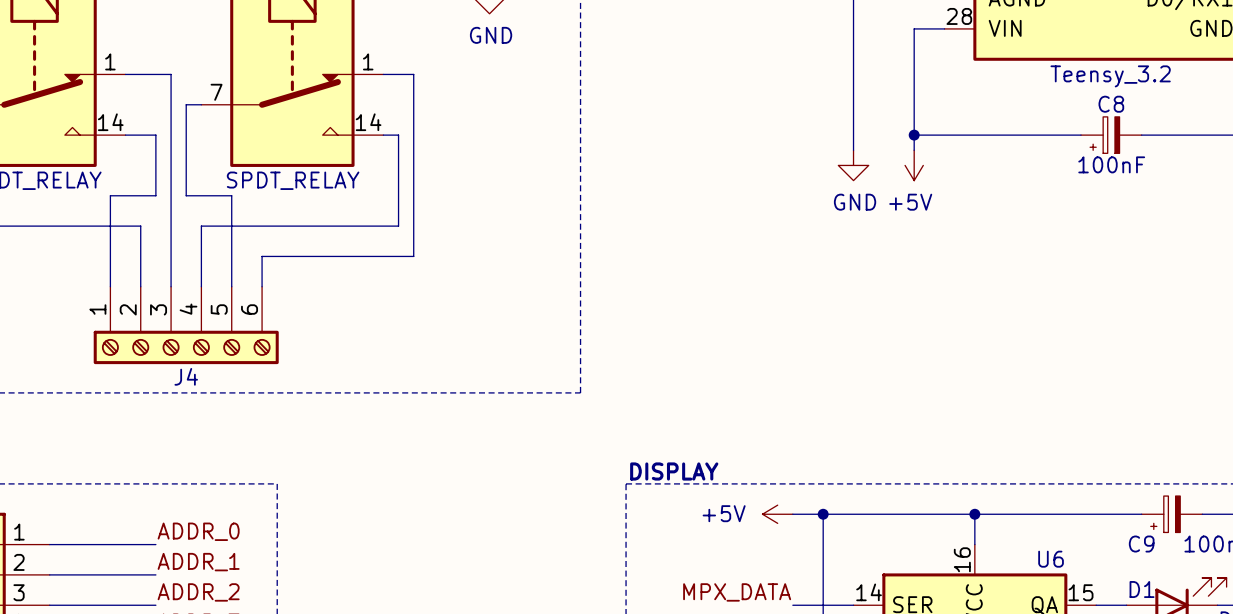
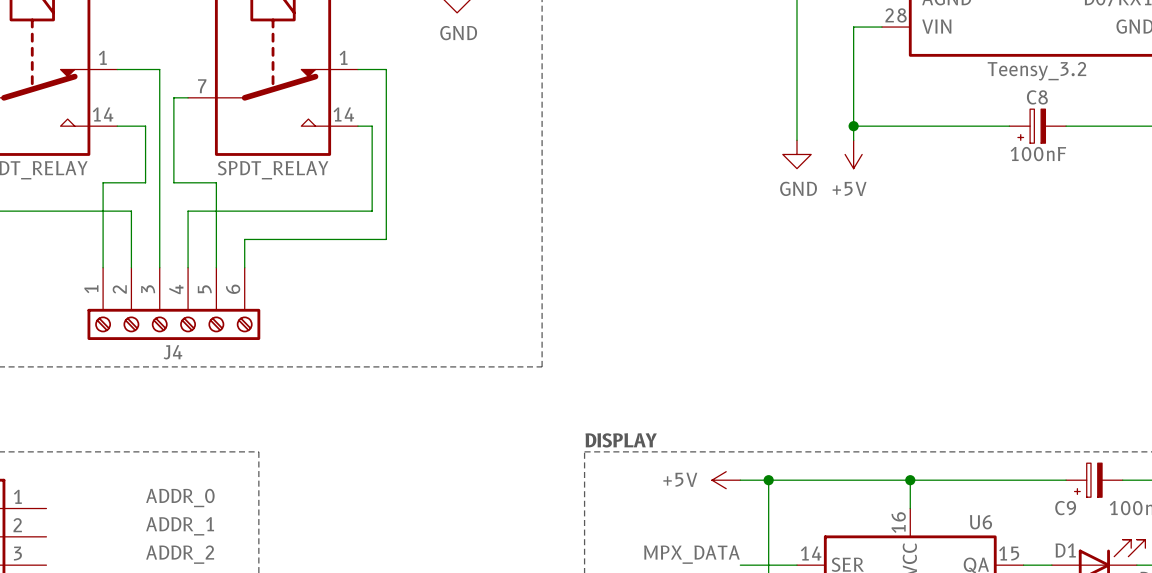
wire: (49, 544) (155, 544) -> none
wire: (49, 574) (155, 574) -> none
wire: (49, 605) (155, 605) -> none

